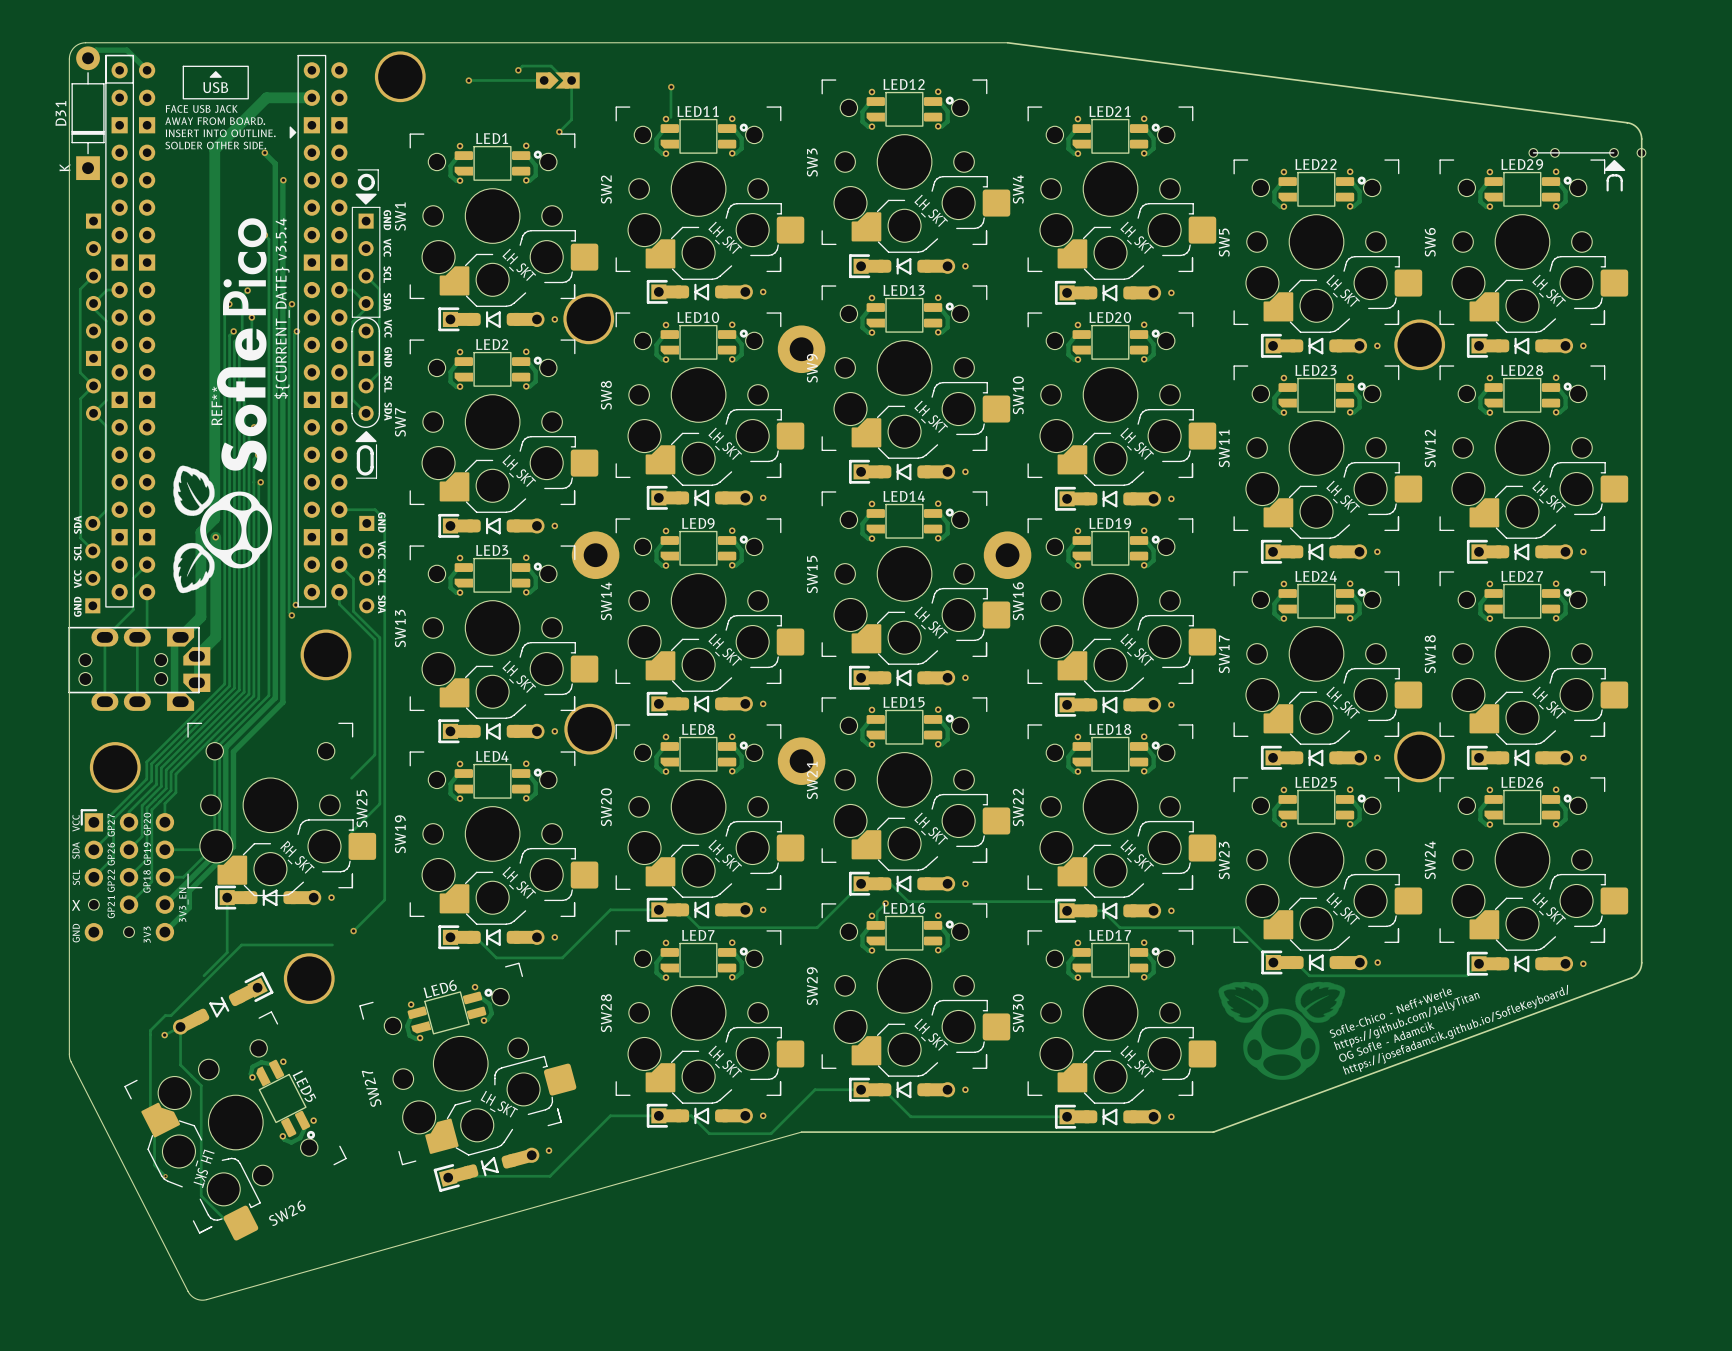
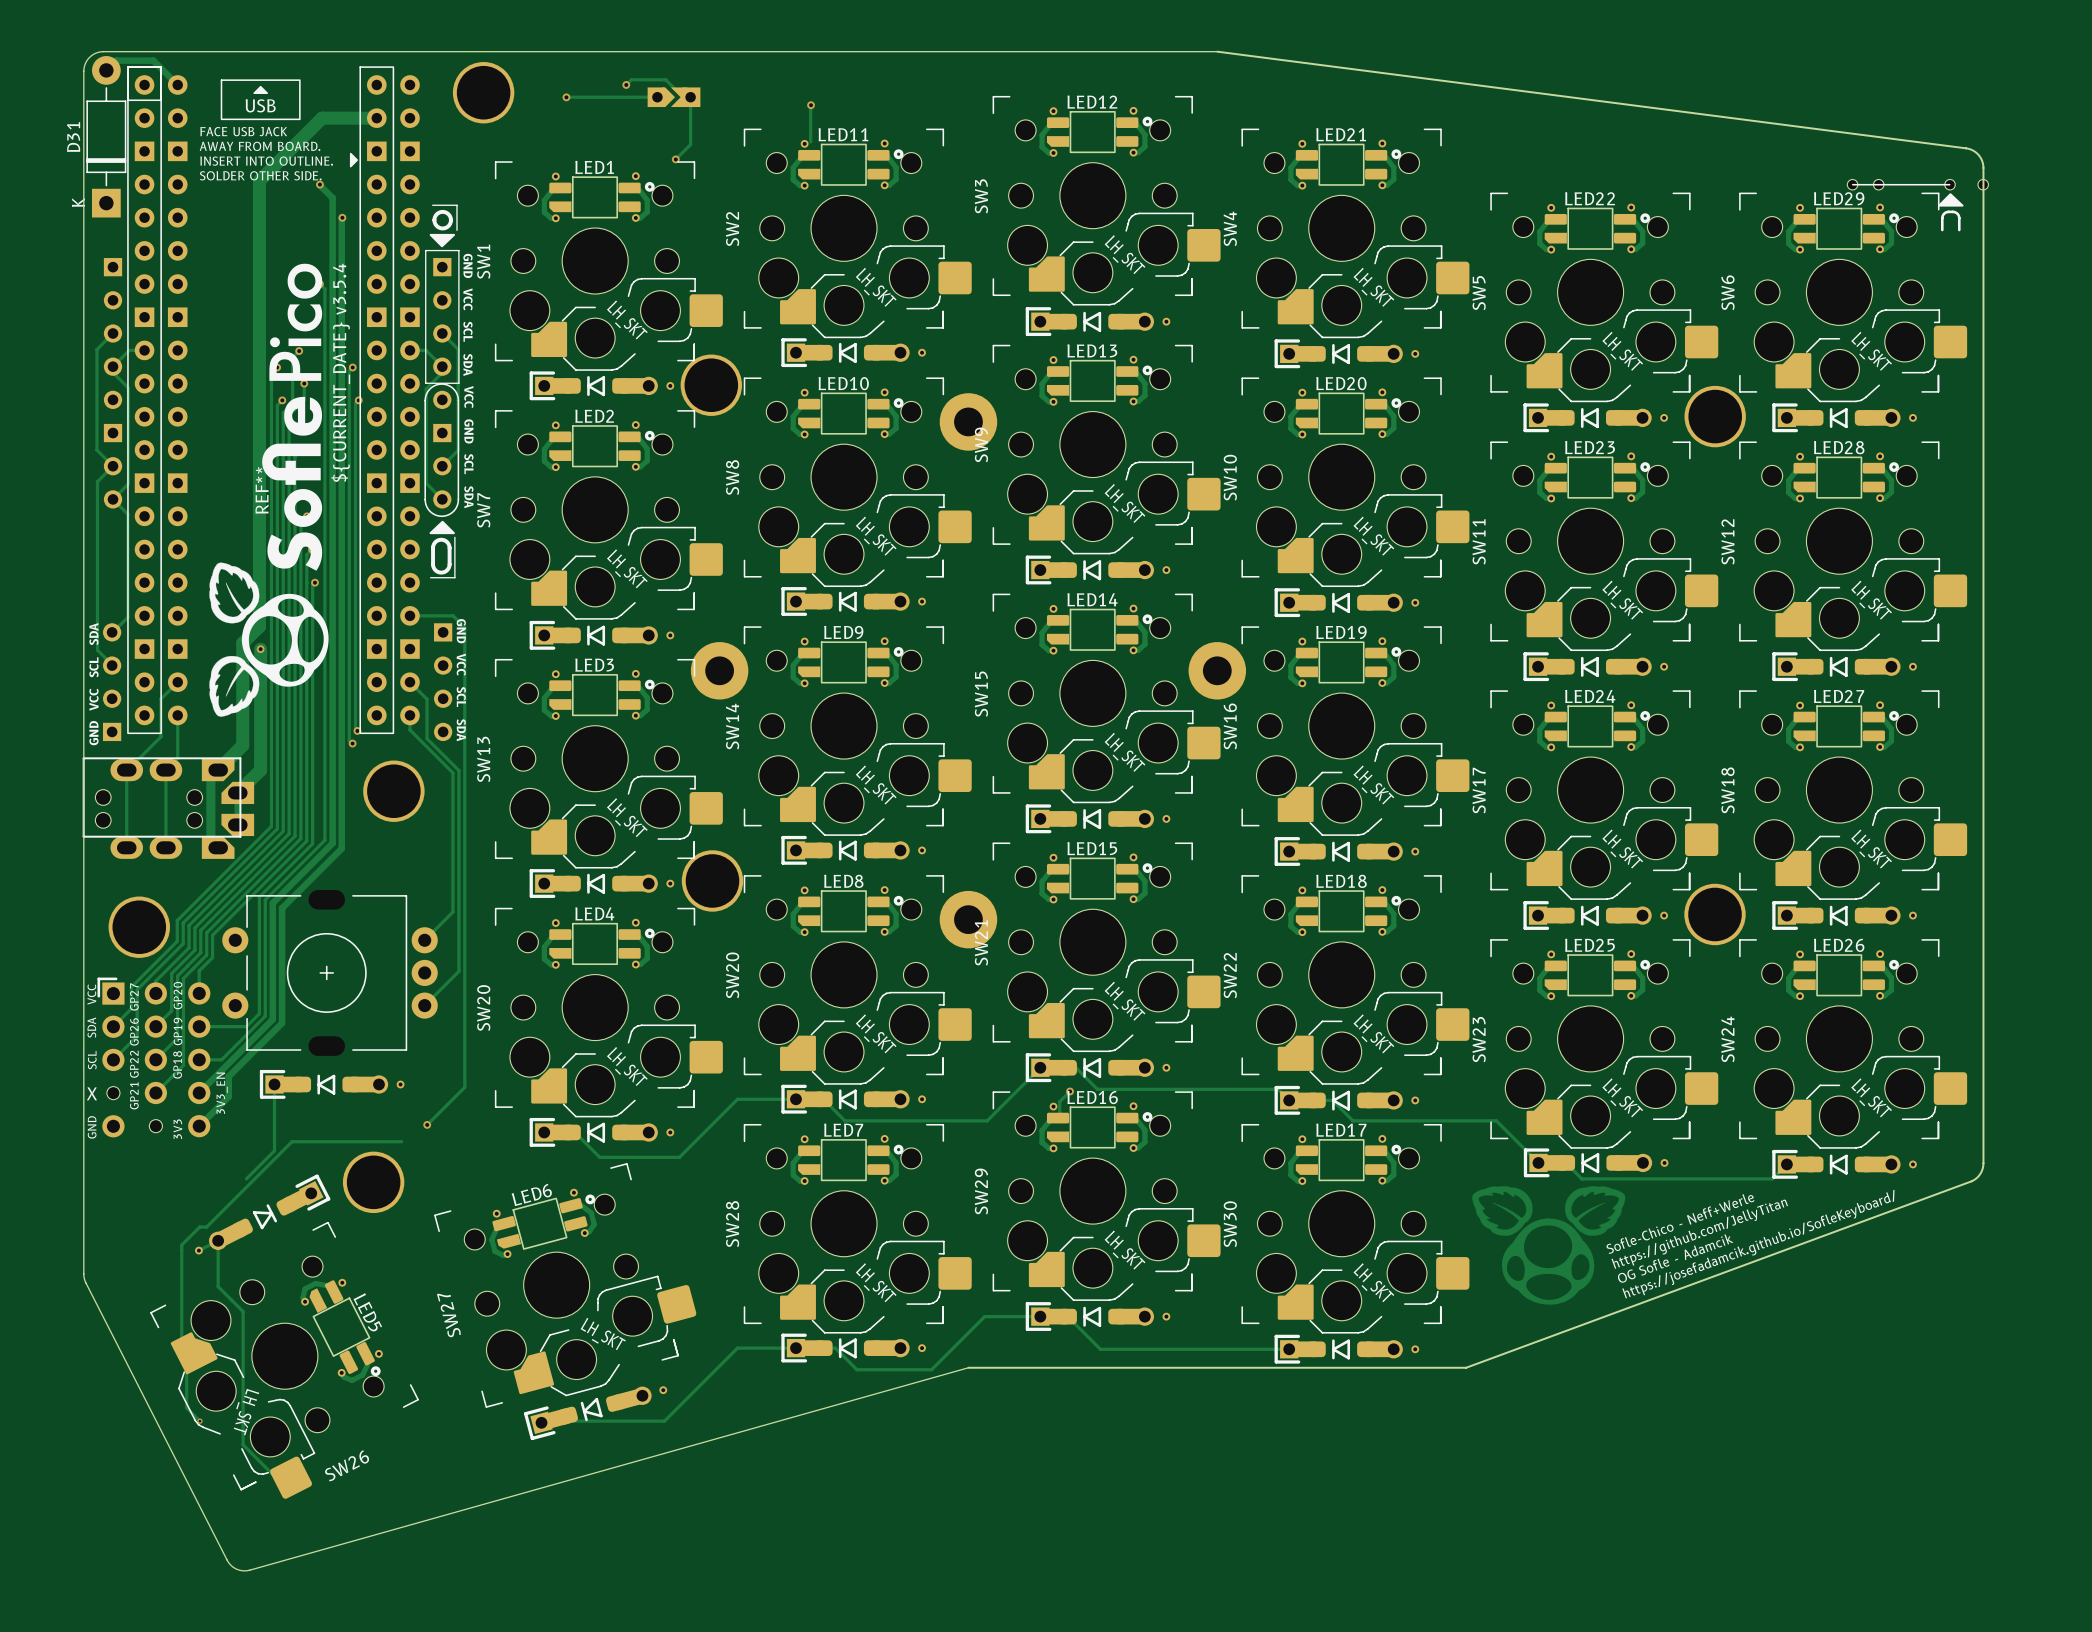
part: none -> (330, 972)
SW25: (281, 809) -> none
SW19 name: SW19 (400, 834) -> SW20 (483, 1008)

